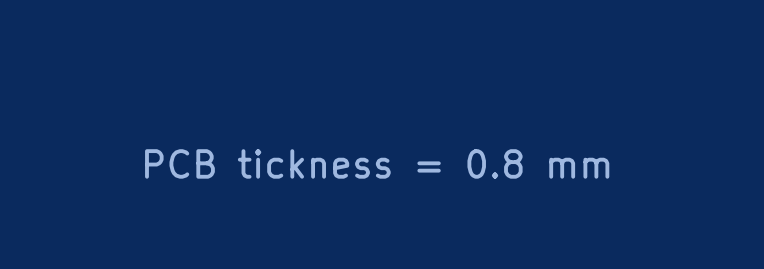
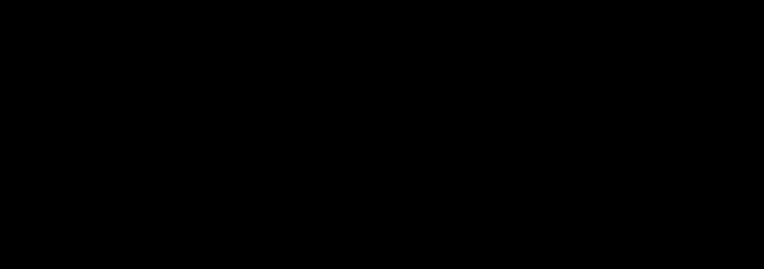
text: PCB tickness = 0.8 mm (377, 163) -> none

